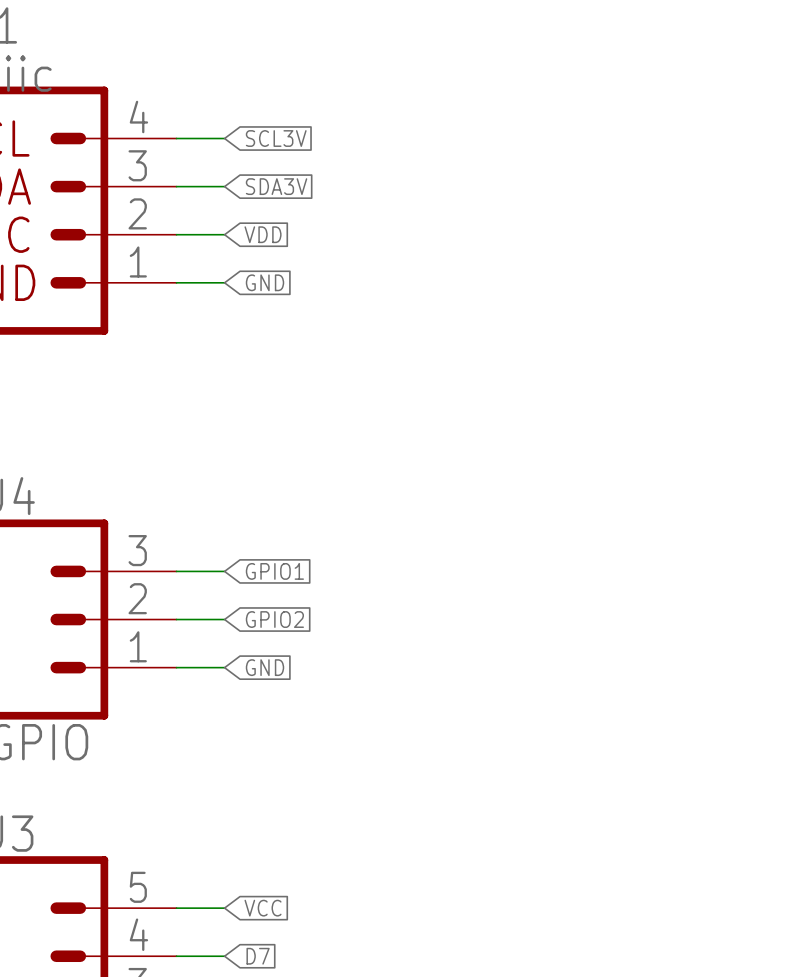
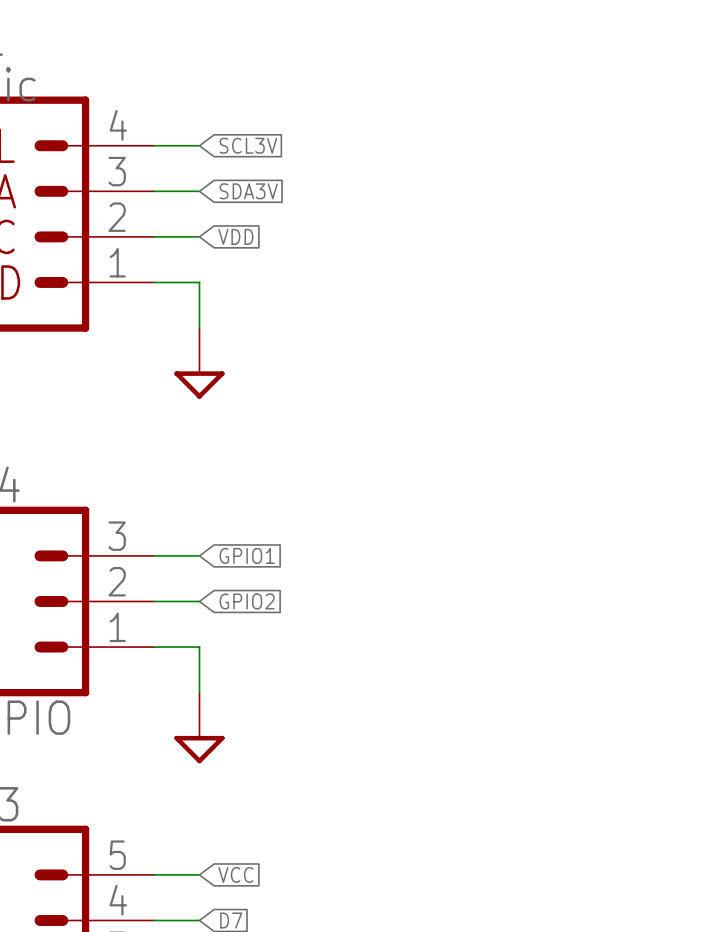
wire: none -> (199, 282) (199, 328)
global label: GND (265, 282) -> none
power symbol: none -> (199, 363)
wire: none -> (199, 647) (199, 692)
global label: GND (265, 667) -> none
power symbol: none -> (199, 727)

